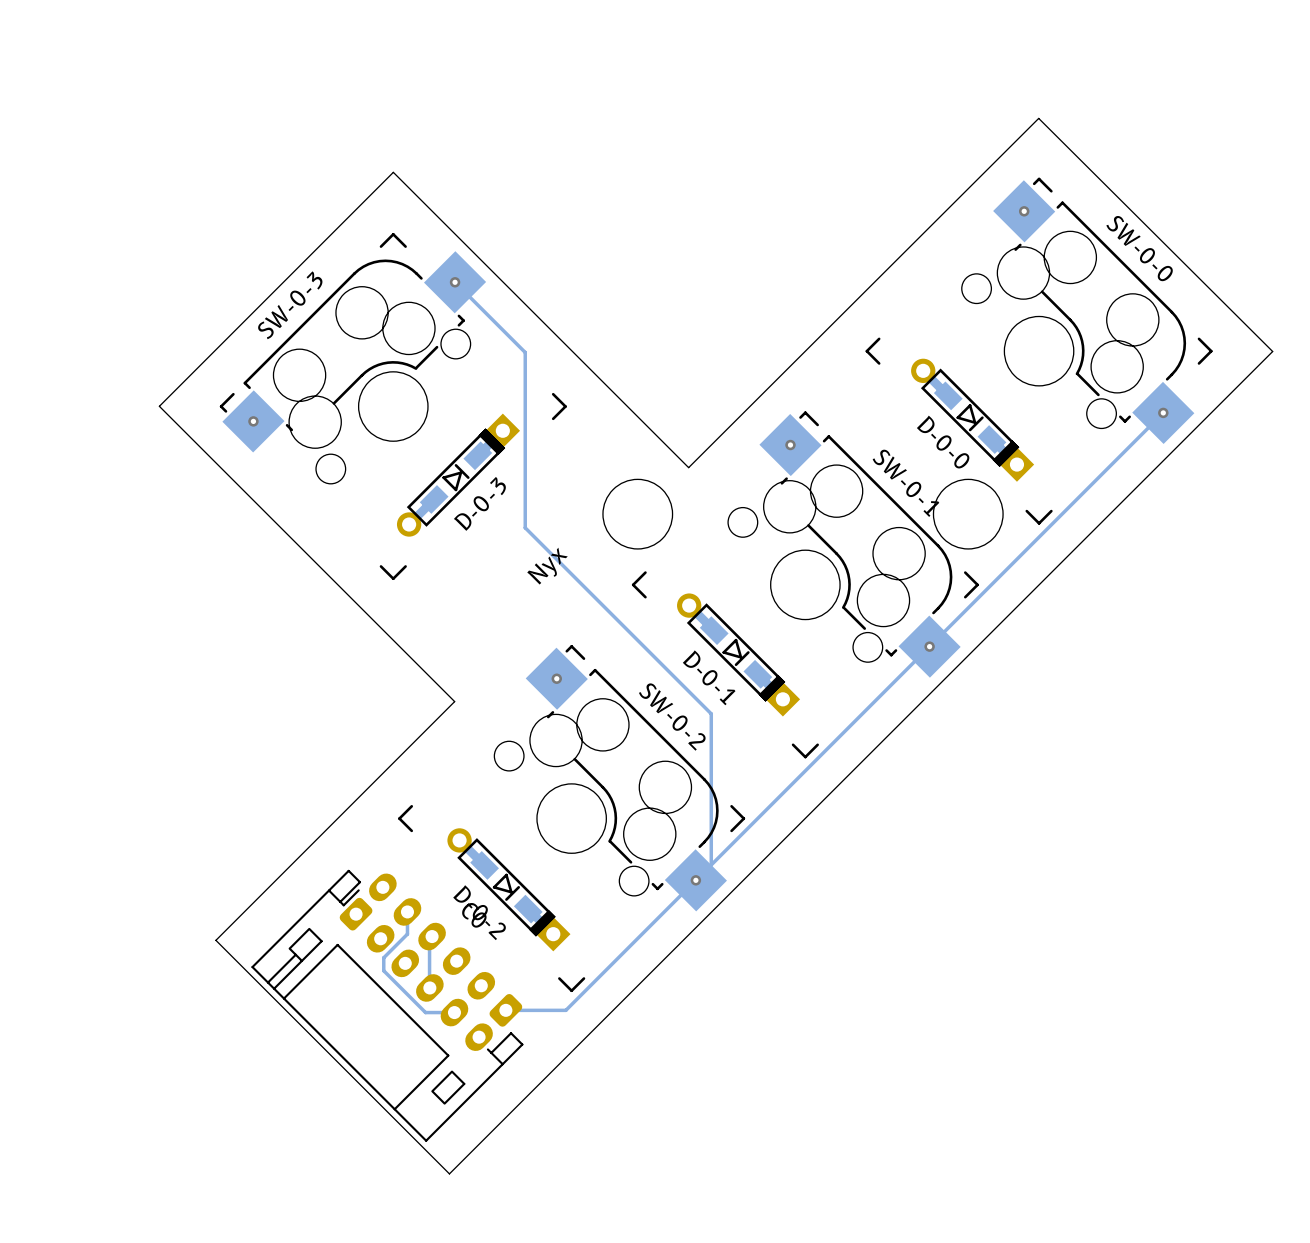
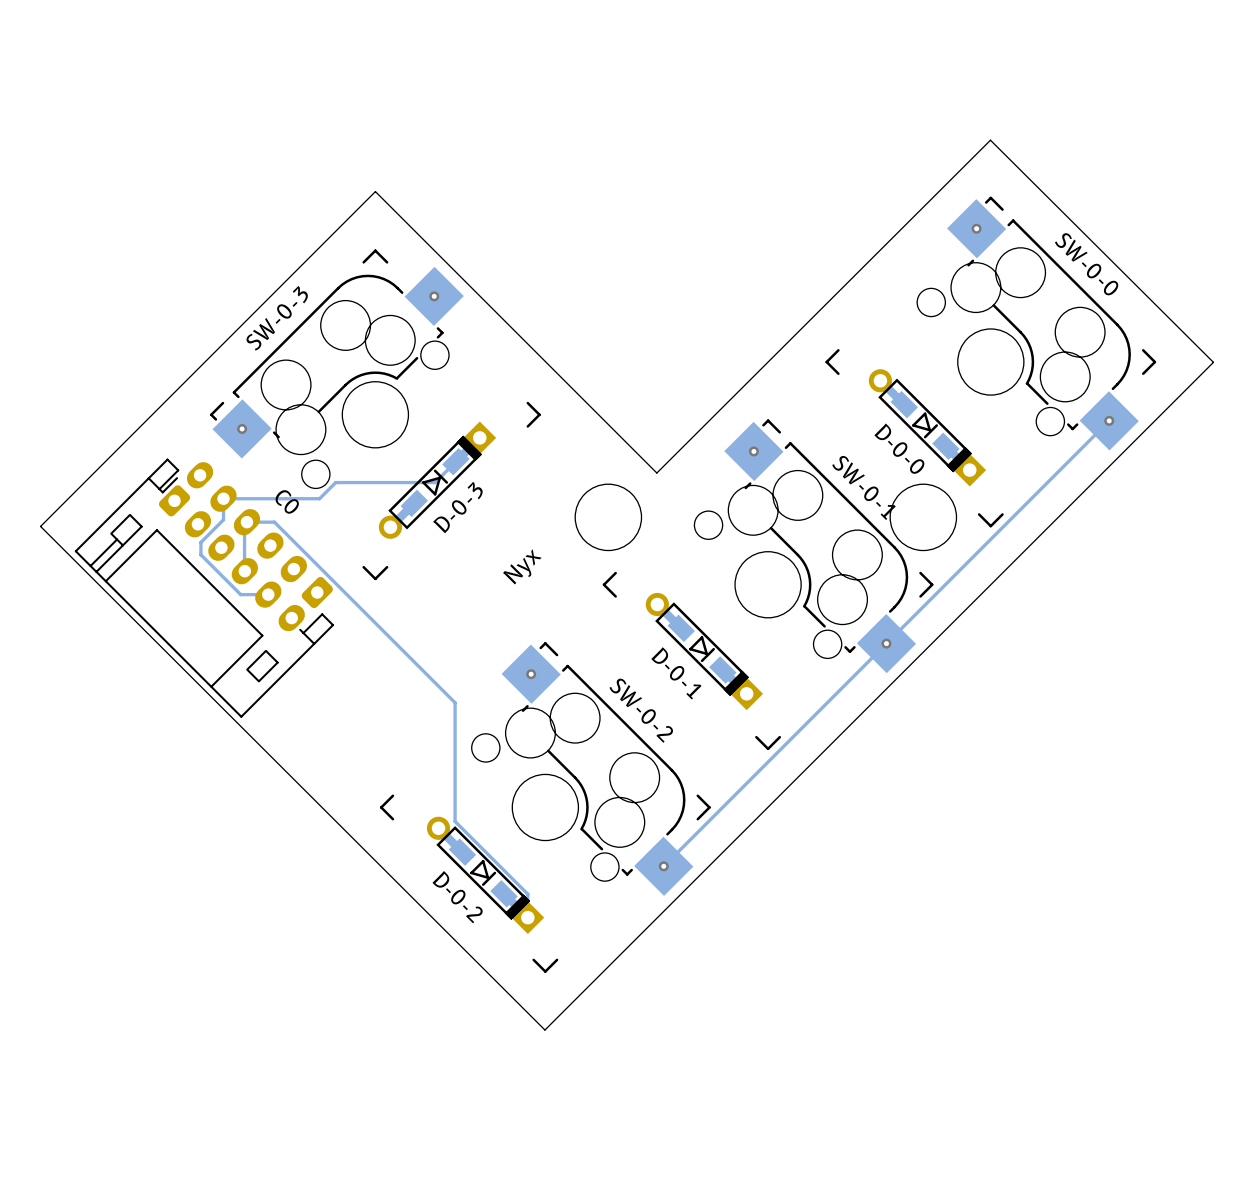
track: (455, 282) (525, 352) (525, 527) (711, 713) (711, 864) -> none
board edge: (1272, 351) (449, 1173) (215, 940) (454, 701) (159, 406) -> (1213, 362) (544, 1030) (40, 526) (152, 414)
track: none -> (479, 437) (435, 482) (335, 482) (319, 498) (223, 498) (223, 519) (200, 542) (200, 554) (240, 594) (268, 594)
track: none -> (246, 522) (274, 522) (455, 702) (455, 821) (527, 894) (527, 917)
track: none -> (244, 523) (244, 570)
track: (695, 880) (565, 1010) (505, 1010) -> none
track: (407, 911) (407, 934) (383, 957) (383, 970) (425, 1012) (454, 1012) -> none
track: (429, 938) (429, 987) -> none
C0 position: (387, 1005) -> (204, 588)

